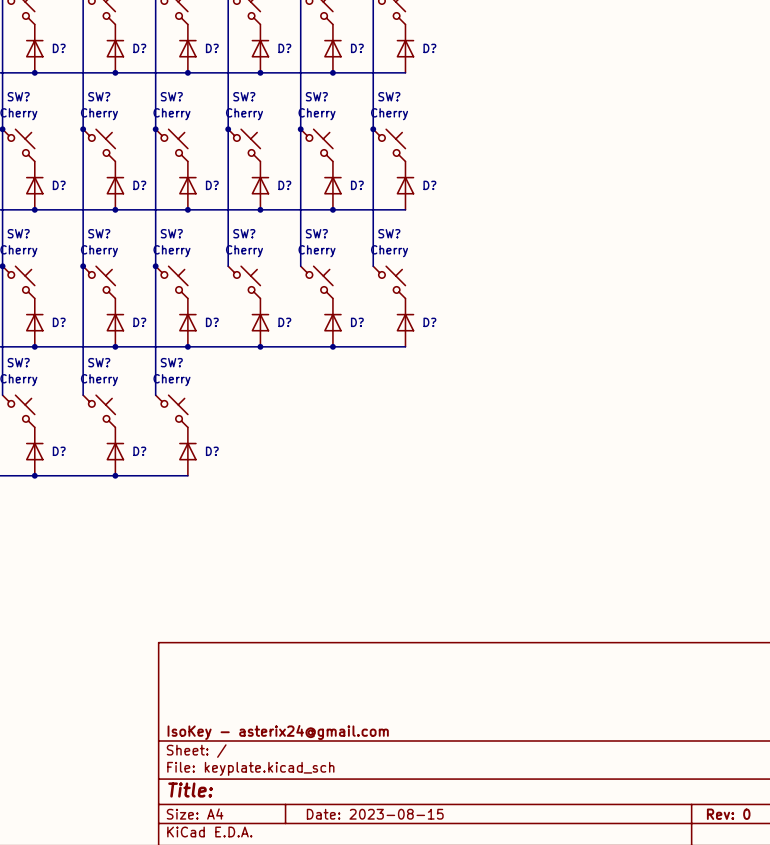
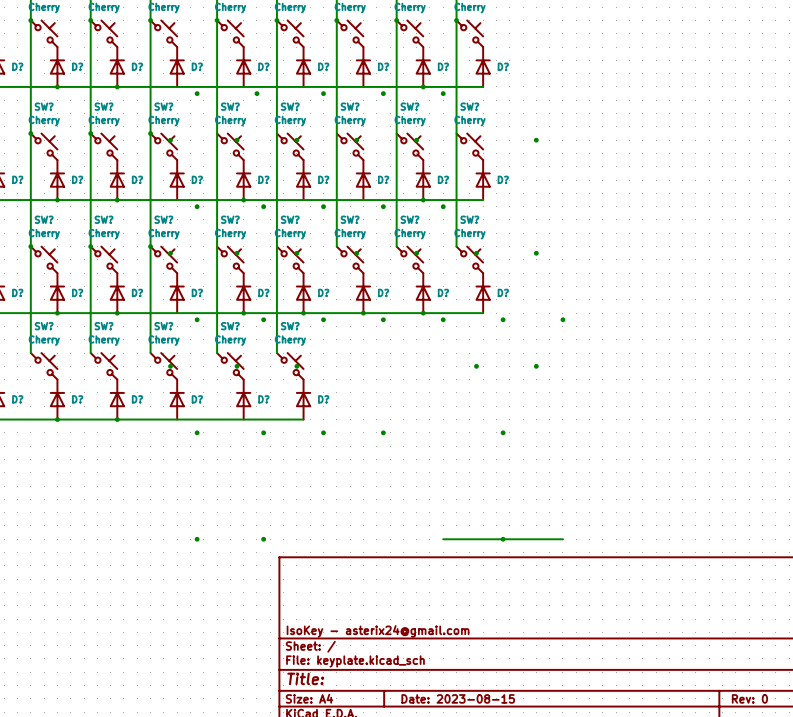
junction position: (34, 72) -> (197, 93)
junction position: (115, 72) -> (256, 93)
junction: (187, 72) -> none
junction: (260, 72) -> none
junction: none -> (323, 93)
junction: none -> (383, 93)
junction: none -> (443, 93)
junction: (83, 129) -> none
junction: (155, 129) -> none
junction: (228, 129) -> none
junction: (300, 129) -> none
junction: (373, 129) -> none
junction: none -> (170, 140)
junction: none -> (237, 140)
junction: none -> (296, 140)
junction: none -> (356, 140)
junction: none -> (416, 140)
junction: none -> (536, 140)
junction position: (34, 209) -> (197, 206)
junction: (187, 209) -> none
junction: (260, 209) -> none
junction: none -> (263, 206)
junction: none -> (323, 206)
junction: none -> (383, 206)
junction: none -> (443, 206)
junction: (83, 266) -> none
junction: (155, 266) -> none
junction: none -> (170, 253)
junction: none -> (237, 253)
junction: none -> (296, 253)
junction: none -> (356, 253)
junction: none -> (416, 253)
junction: none -> (476, 253)
junction: none -> (536, 253)
junction position: (34, 346) -> (197, 319)
junction: none -> (263, 319)
junction: none -> (323, 319)
junction: none -> (383, 319)
junction: none -> (443, 319)
junction: none -> (503, 319)
junction: none -> (562, 319)
junction: none -> (170, 366)
junction: none -> (237, 366)
junction: none -> (296, 366)
junction: none -> (476, 366)
junction: none -> (536, 366)
junction position: (34, 475) -> (197, 432)
junction position: (115, 475) -> (263, 432)
junction: none -> (323, 432)
junction: none -> (383, 432)
junction: none -> (503, 432)
junction: none -> (197, 539)
junction: none -> (263, 539)
wire: none -> (443, 539) (562, 539)
junction: none -> (503, 539)

